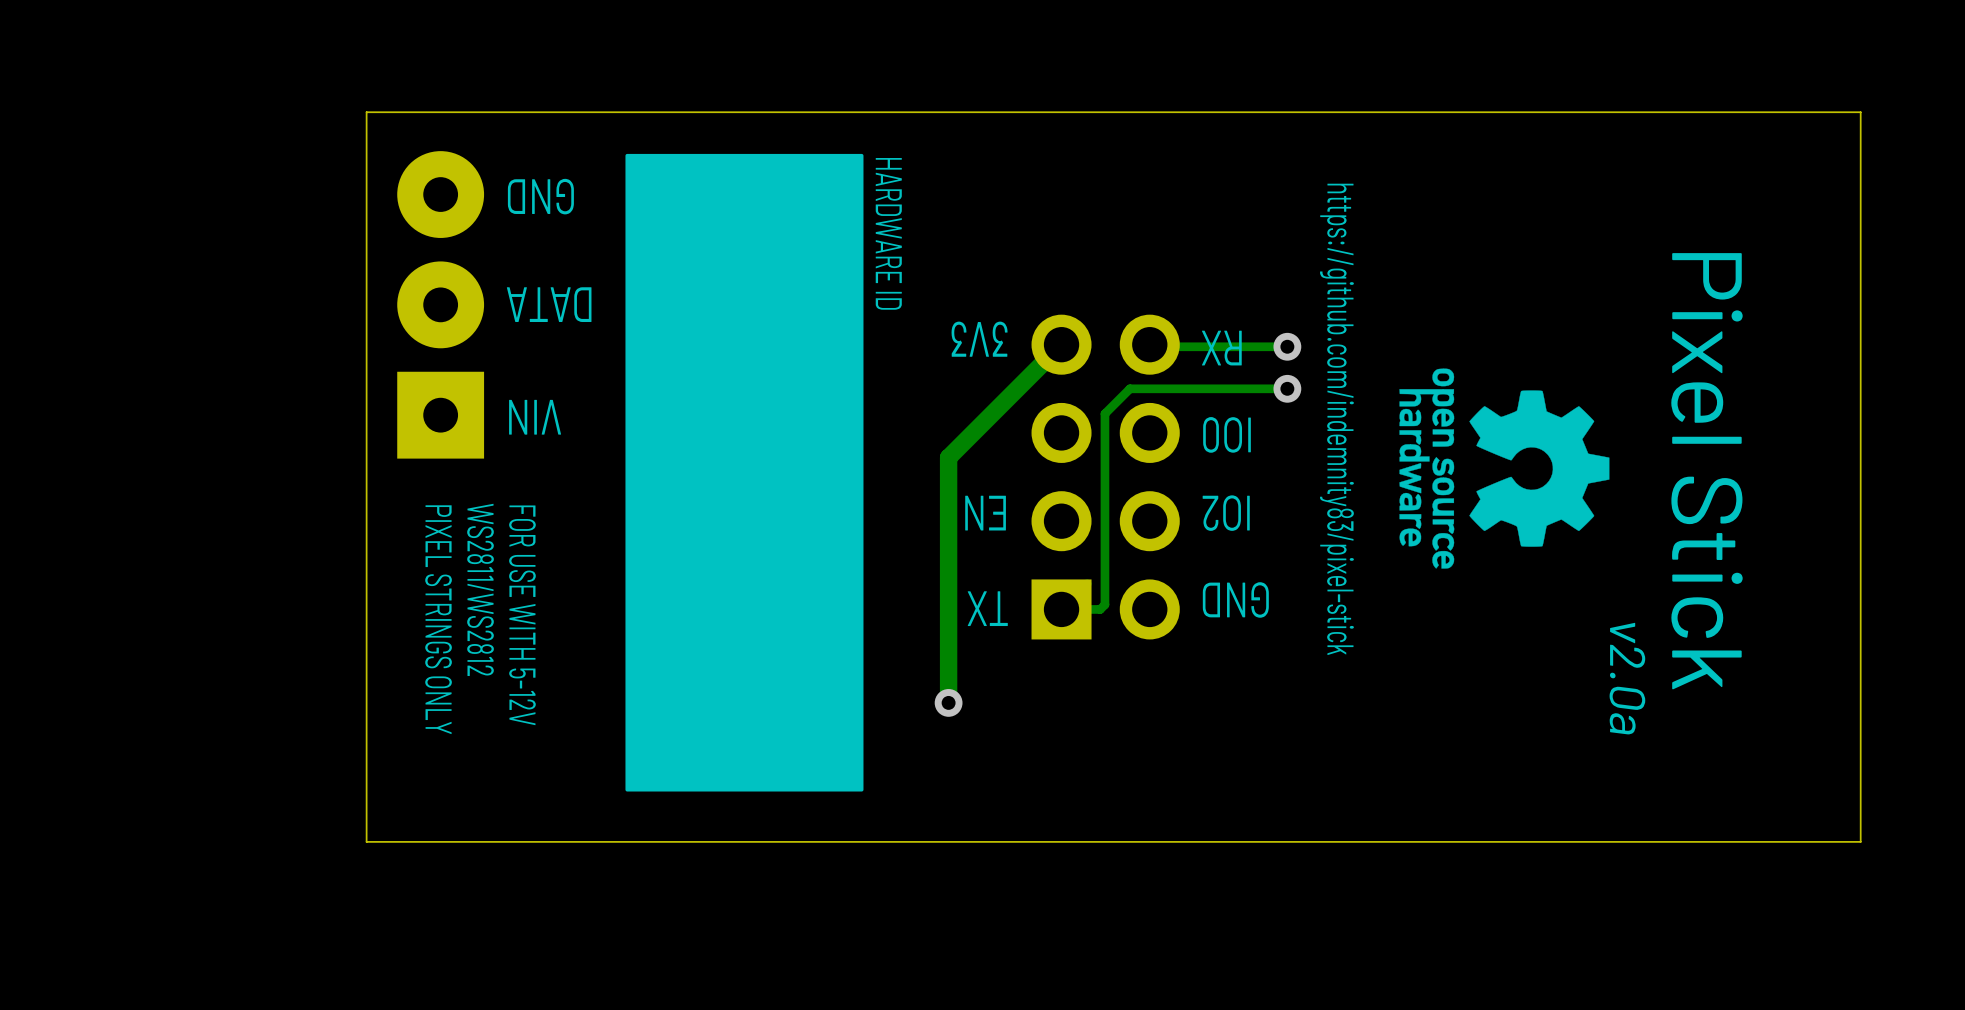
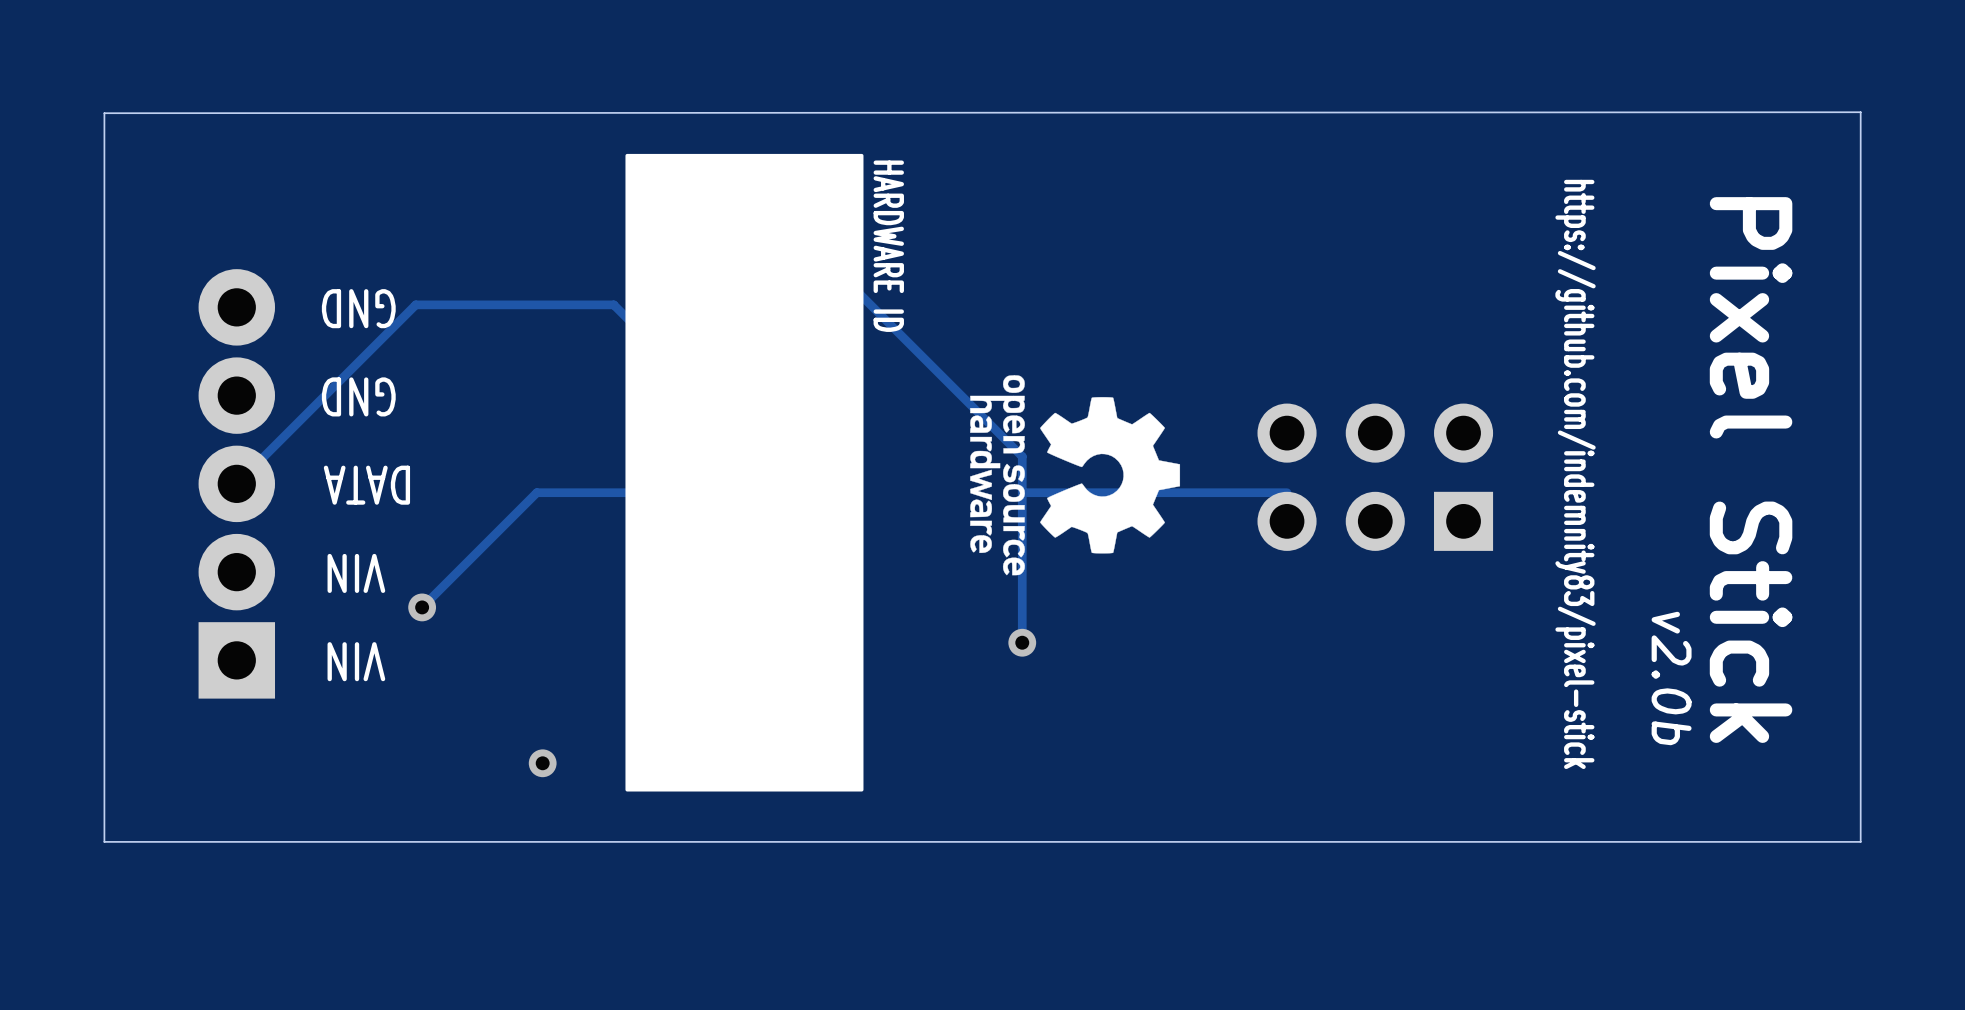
board edge: (1860, 112) (366, 112) (366, 841) -> (1860, 112) (104, 113) (104, 841) (366, 841)
text: GND (540, 196) -> none
track: none -> (793, 227) (1022, 456) (1022, 642)
part: (440, 304) -> none
text position: DATA (549, 304) -> DATA (366, 485)
text: none -> GND (358, 308)
text: 3V3 (979, 339) -> none
track: (1061, 344) (948, 457) (948, 702) -> none
track: (1149, 344) (1151, 346) (1287, 346) -> none
via: (1287, 346) -> none
text: RX (1221, 348) -> none
track: (1287, 388) (1129, 388) (1104, 413) (1104, 604) (1100, 609) (1061, 609) (1087, 583) -> none
via: (1287, 388) -> none
text: none -> GND (358, 396)
text: VIN (535, 417) -> none
text position: https://github.com/indemnity83/pixel-stick (1336, 419) -> https://github.com/indemnity83/pixel-stick (1575, 474)
text: IO0 (1227, 434) -> none
drawing position: (1504, 468) -> (1075, 475)
text position: Pixel Stick (1706, 471) -> Pixel Stick (1751, 470)
part: (1105, 477) -> none
part: none -> (1375, 477)
track: none -> (236, 483) (415, 304) (613, 304) (757, 448) (757, 492) (536, 492) (422, 607)
part: none -> (236, 483)
track: none -> (1287, 492) (1022, 492)
text: EN (985, 513) -> none
text: IO2 (1226, 513) -> none
text: none -> VIN (356, 573)
text: WS2811/WS2812 (480, 589) -> none
text: GND (1235, 599) -> none
via: none -> (422, 607)
text: TX (987, 608) -> none
text: FOR USE WITH 5-12V (522, 615) -> none
text: PIXEL STRINGS ONLY (438, 619) -> none
text: none -> VIN (356, 661)
text: v2.0a (1627, 678) -> v2.0b (1671, 678)
via position: (948, 702) -> (1022, 642)
via: none -> (542, 763)

